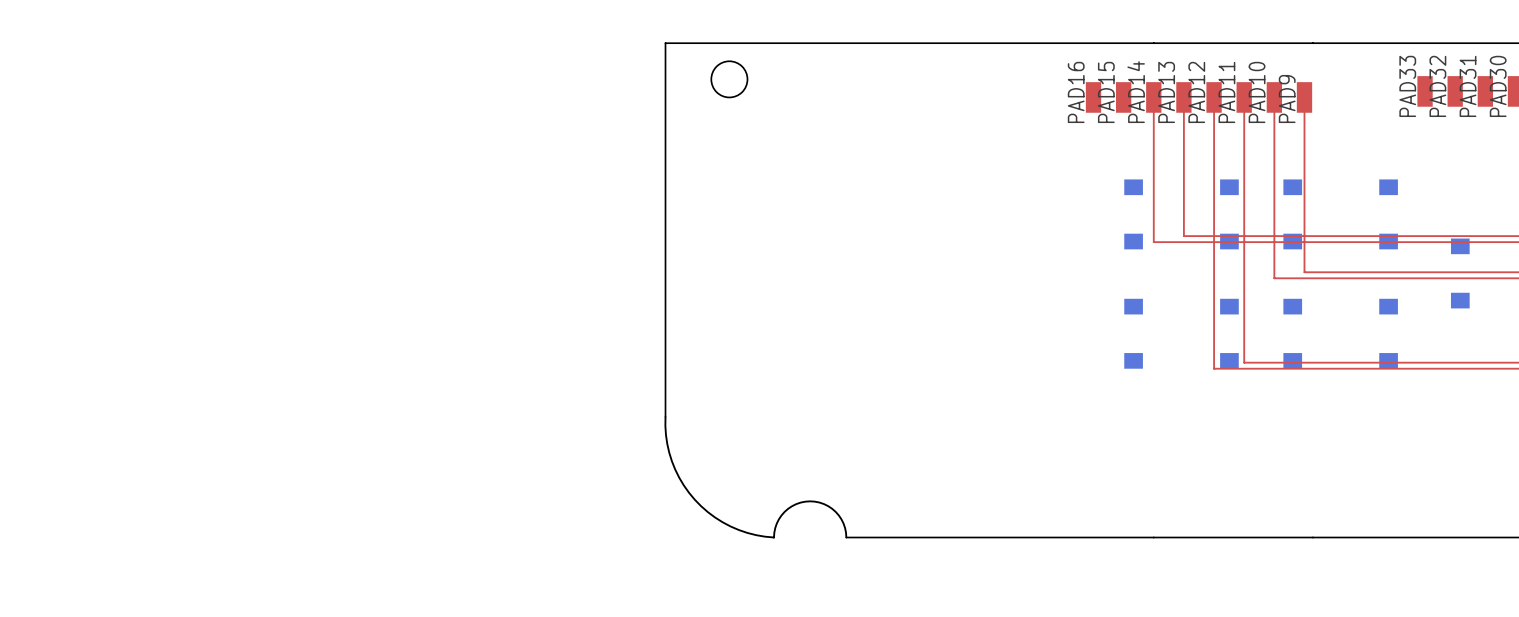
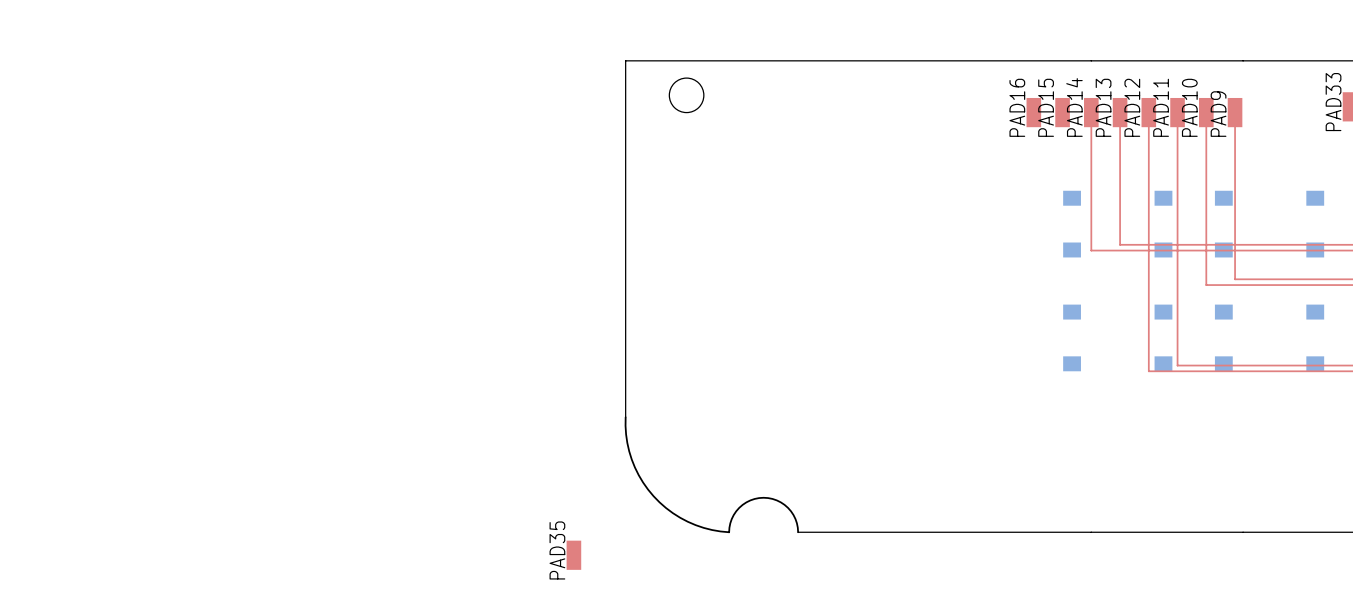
PAD35: none -> (573, 555)

